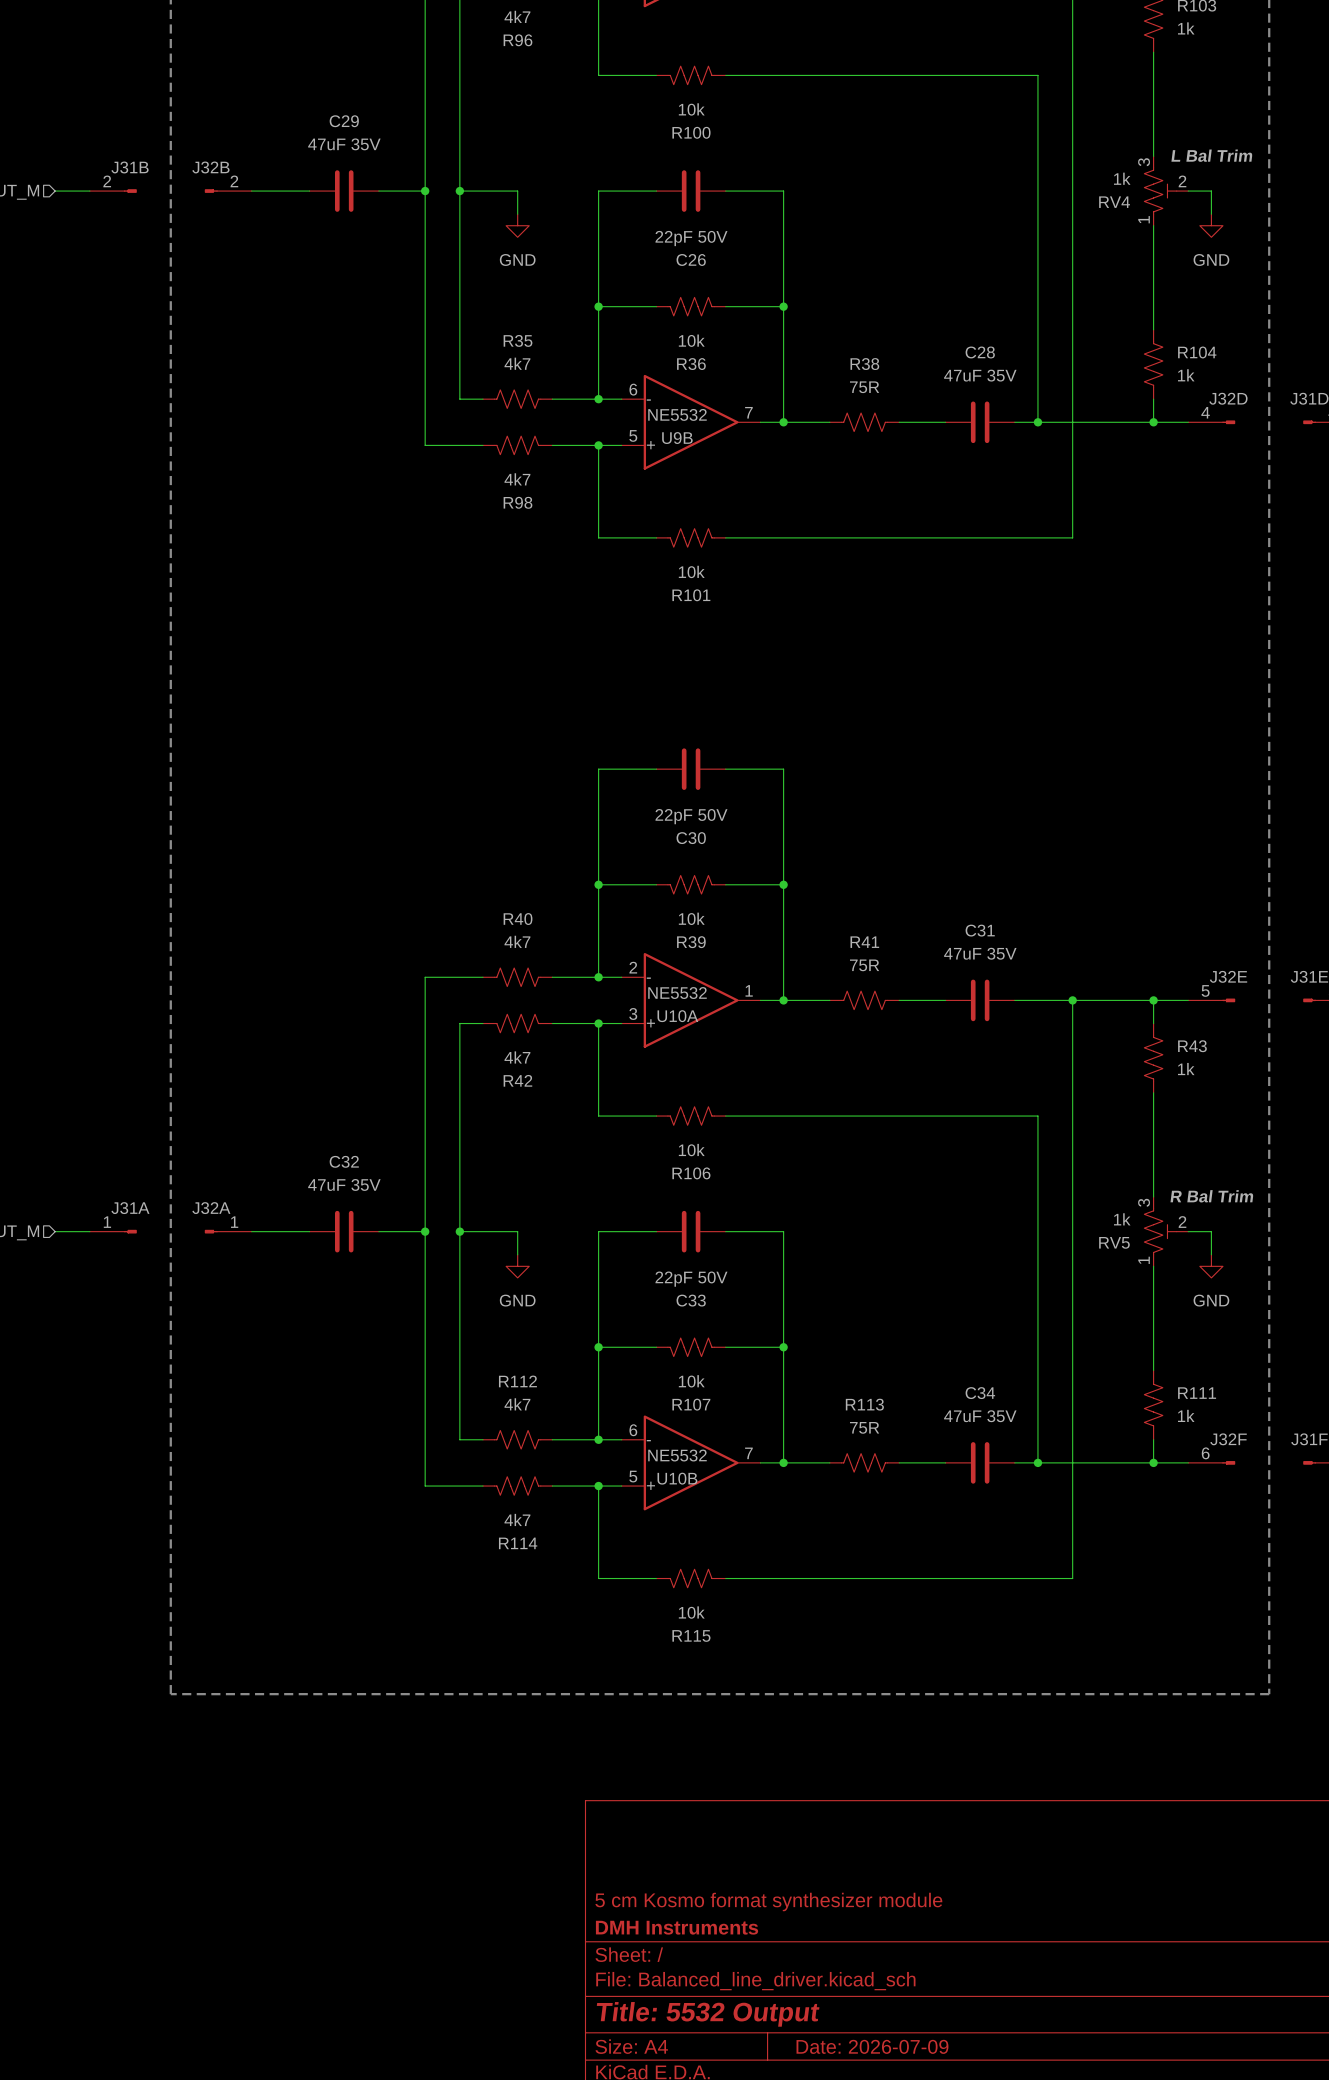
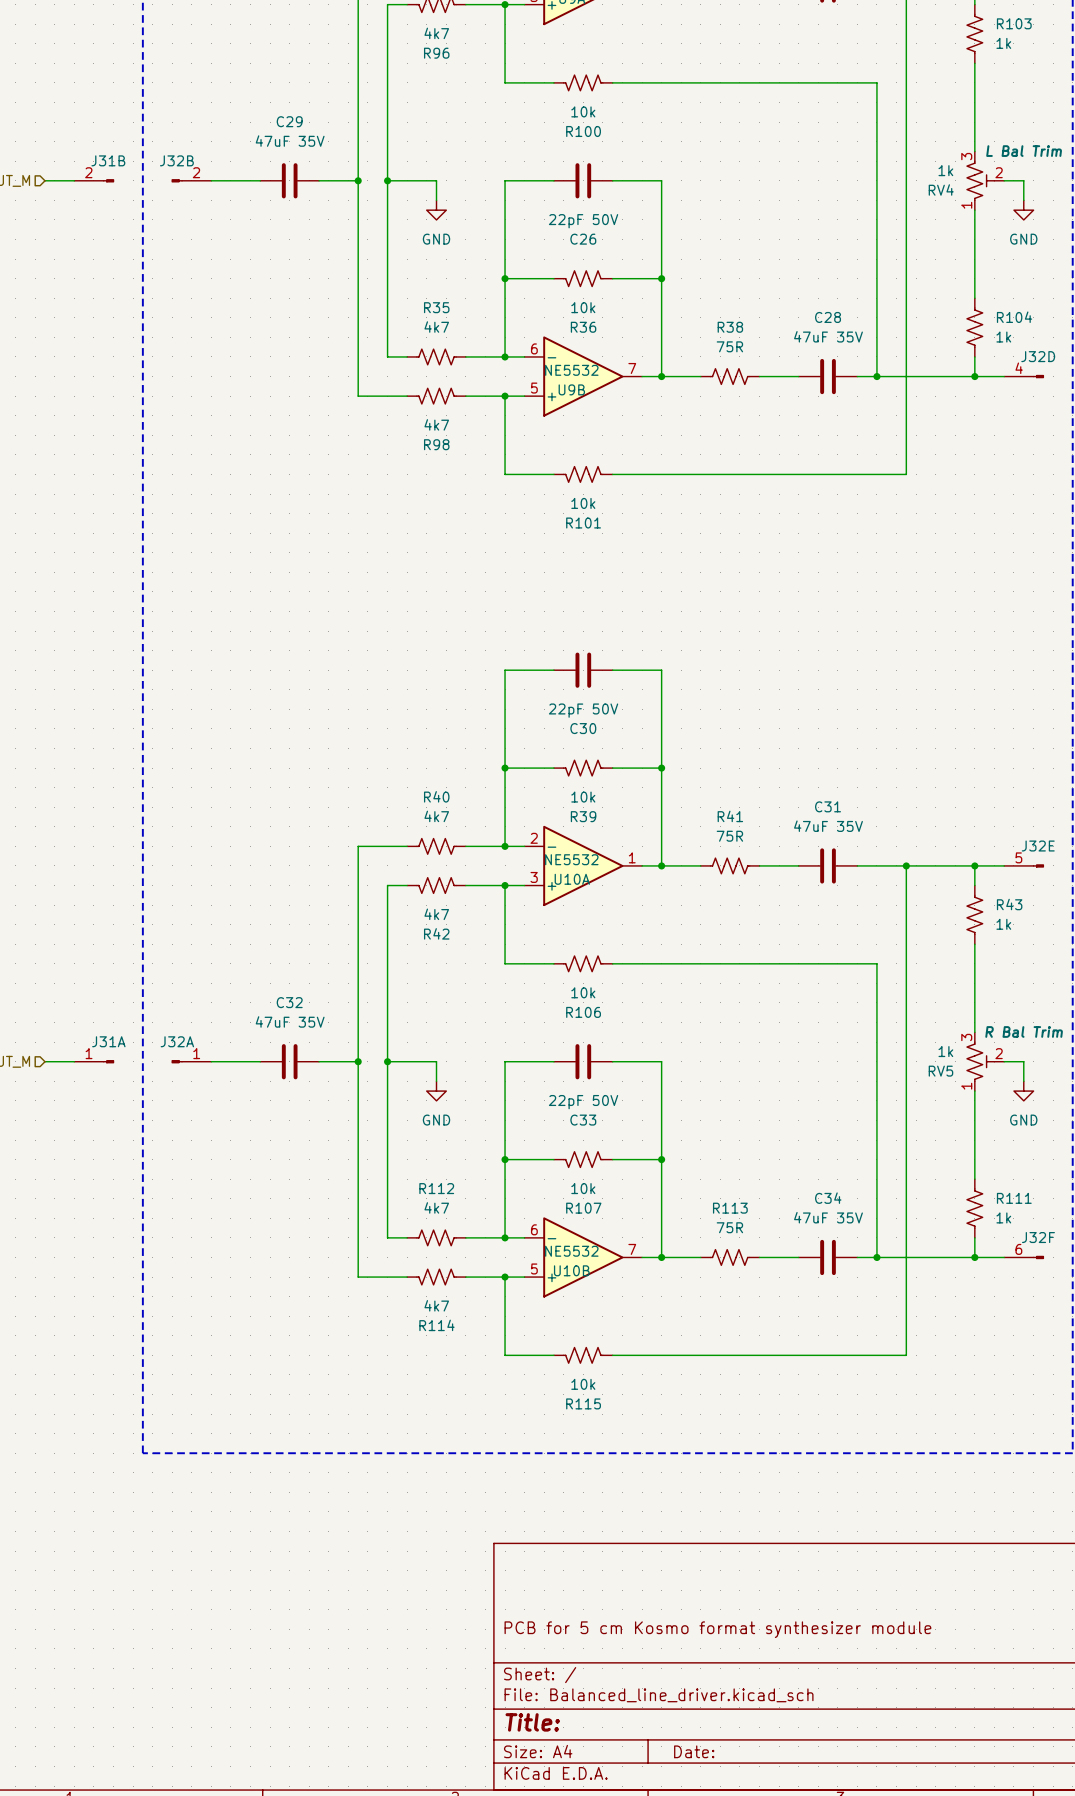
title block: 5 cm Kosmo format synthesizer module (768, 1901) -> PCB for 5 cm Kosmo format synthesizer module (717, 1629)
title block: DMH Instruments (677, 1927) -> none
title block: Title: 5532 Output (708, 2014) -> Title: (532, 1722)
title block: Date: 2026-07-09 (872, 2046) -> Date: (694, 1751)

